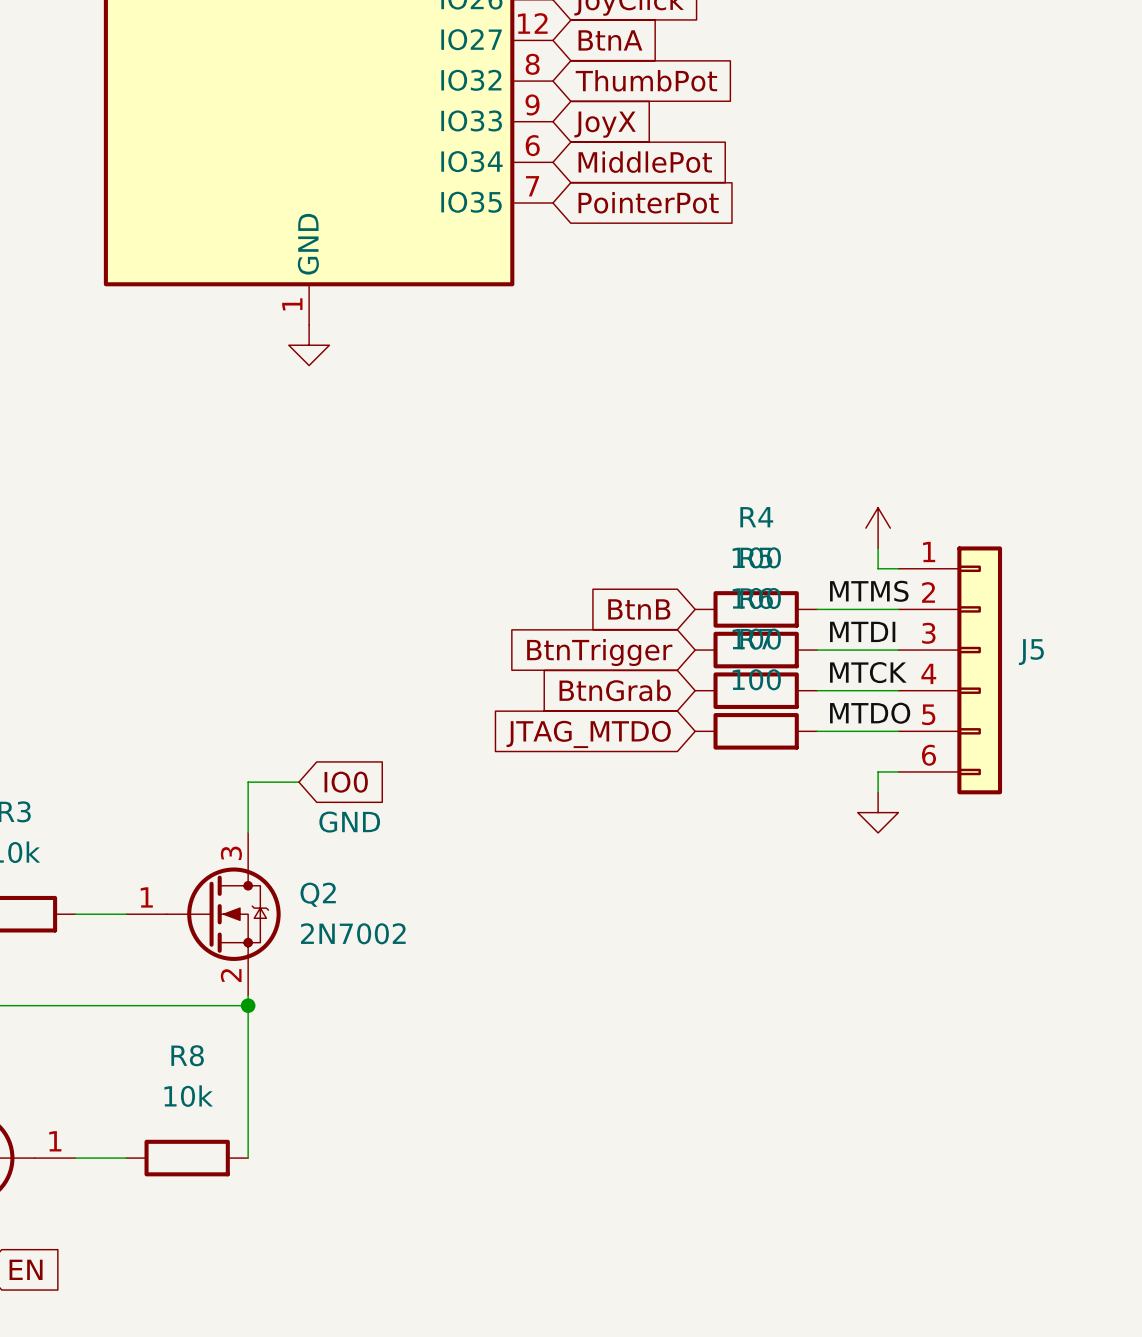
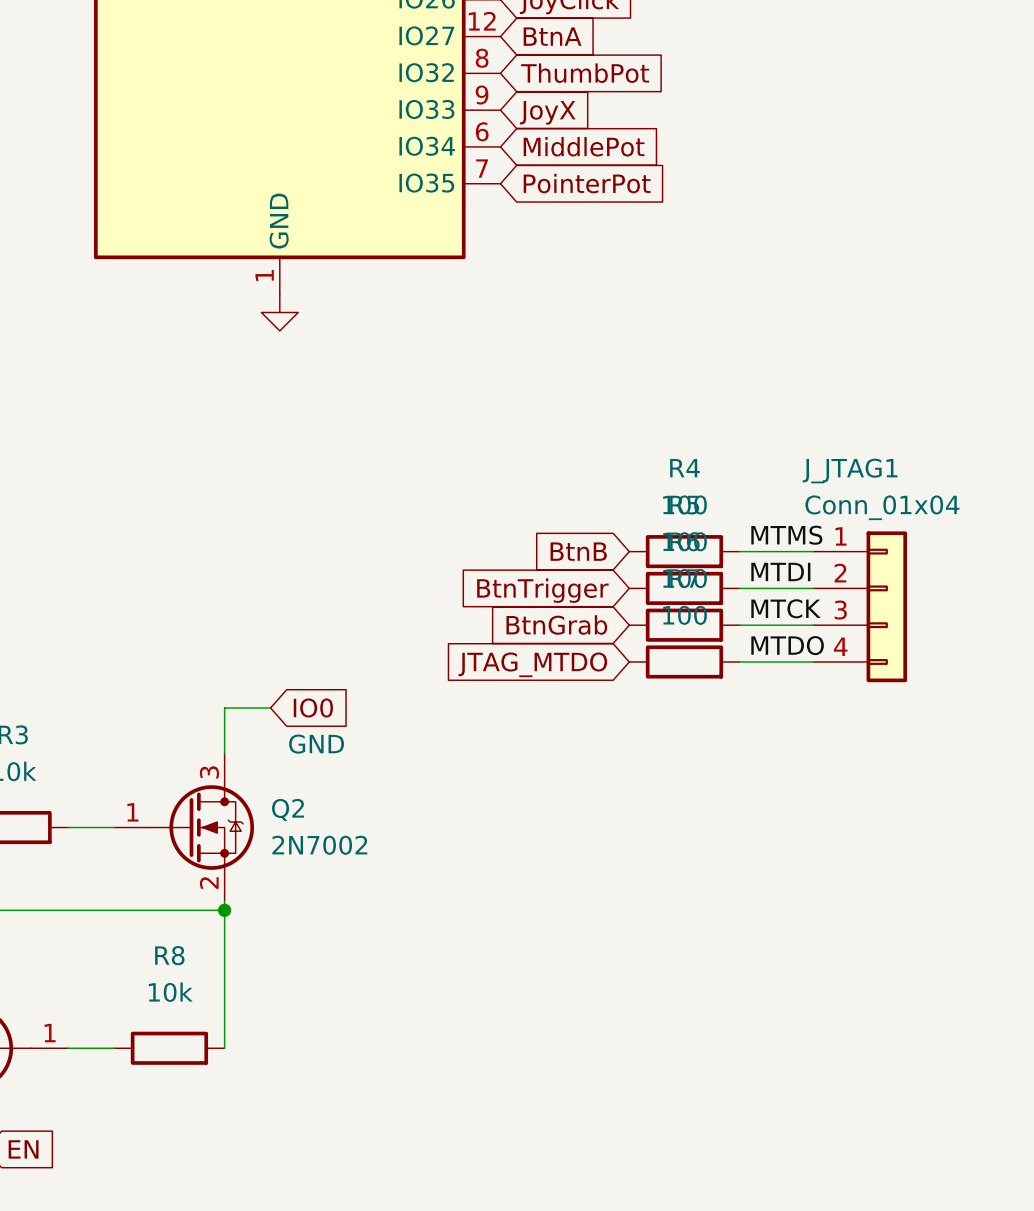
power symbol: (878, 528) -> none
wire: (878, 548) (878, 568) (898, 568) -> none
J5: (950, 670) -> none
J_JTAG1: none -> Conn_01x04 (860, 606)
wire: (898, 771) (878, 771) (878, 792) -> none
power symbol: (878, 812) -> none

